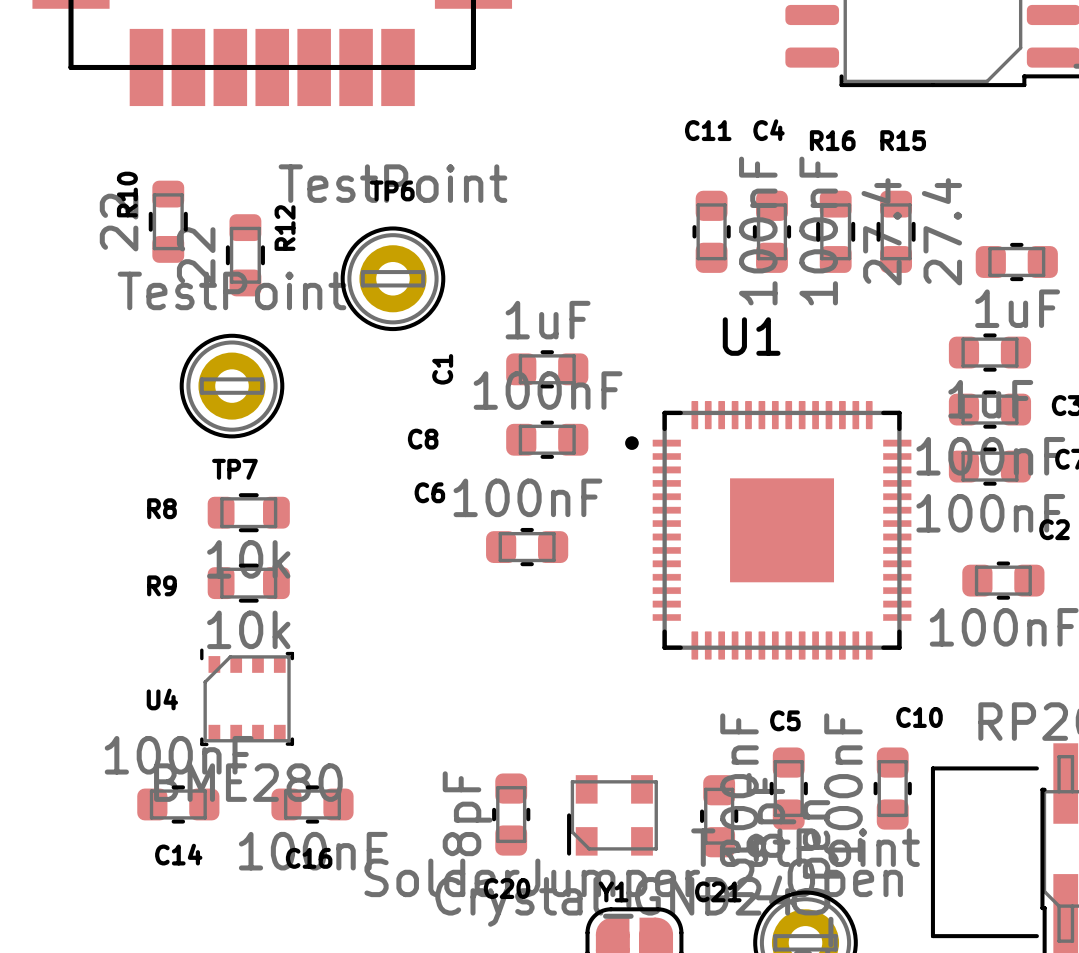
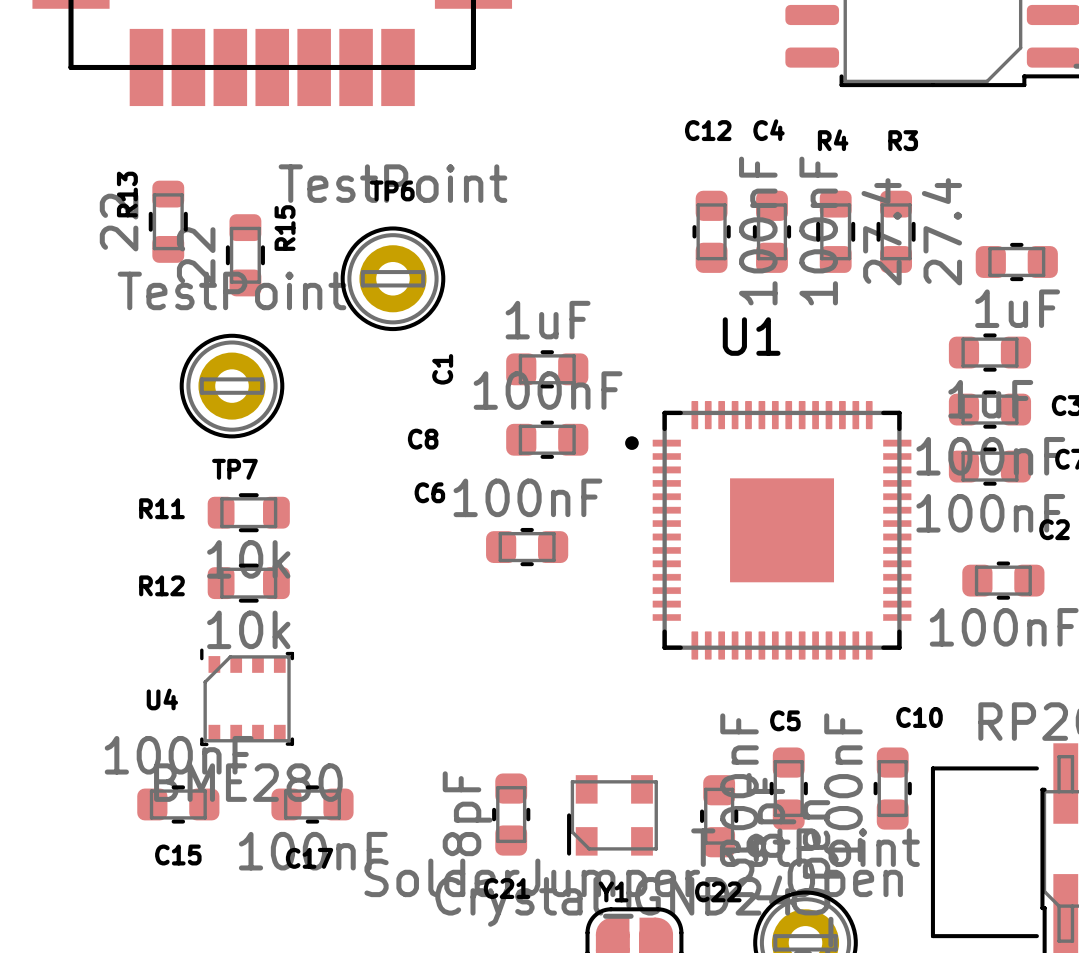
C11 name: C11 (708, 130) -> C12 (708, 130)
R16 name: R16 (832, 140) -> R4 (833, 140)
R15 name: R15 (903, 140) -> R3 (903, 140)
R10 name: R10 (127, 194) -> R13 (127, 194)
R12 name: R12 (285, 228) -> R15 (285, 228)
R8 name: R8 (161, 508) -> R11 (161, 508)
R9 name: R9 (161, 585) -> R12 (161, 585)
C14 name: C14 (178, 854) -> C15 (178, 855)
C16 name: C16 (309, 858) -> C17 (309, 858)
C20 name: C20 (507, 888) -> C21 (507, 888)
C21 name: C21 (718, 891) -> C22 (718, 891)

